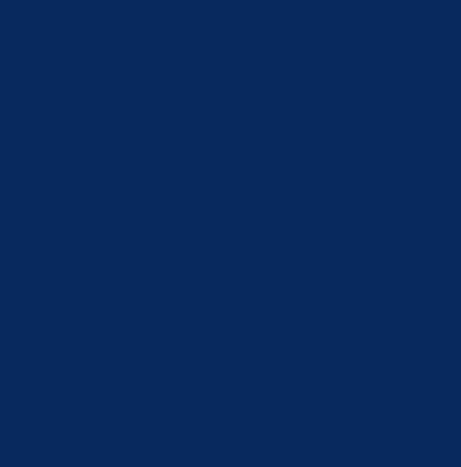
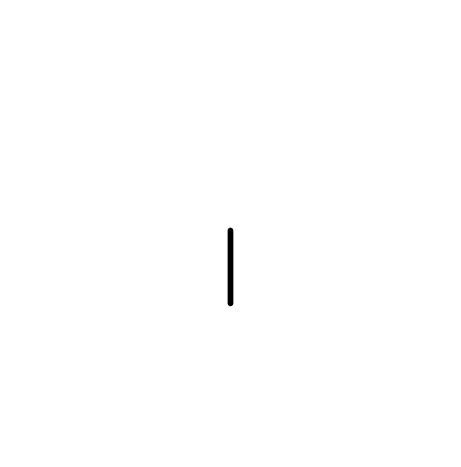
board edge: none -> (230, 230) (230, 303)

